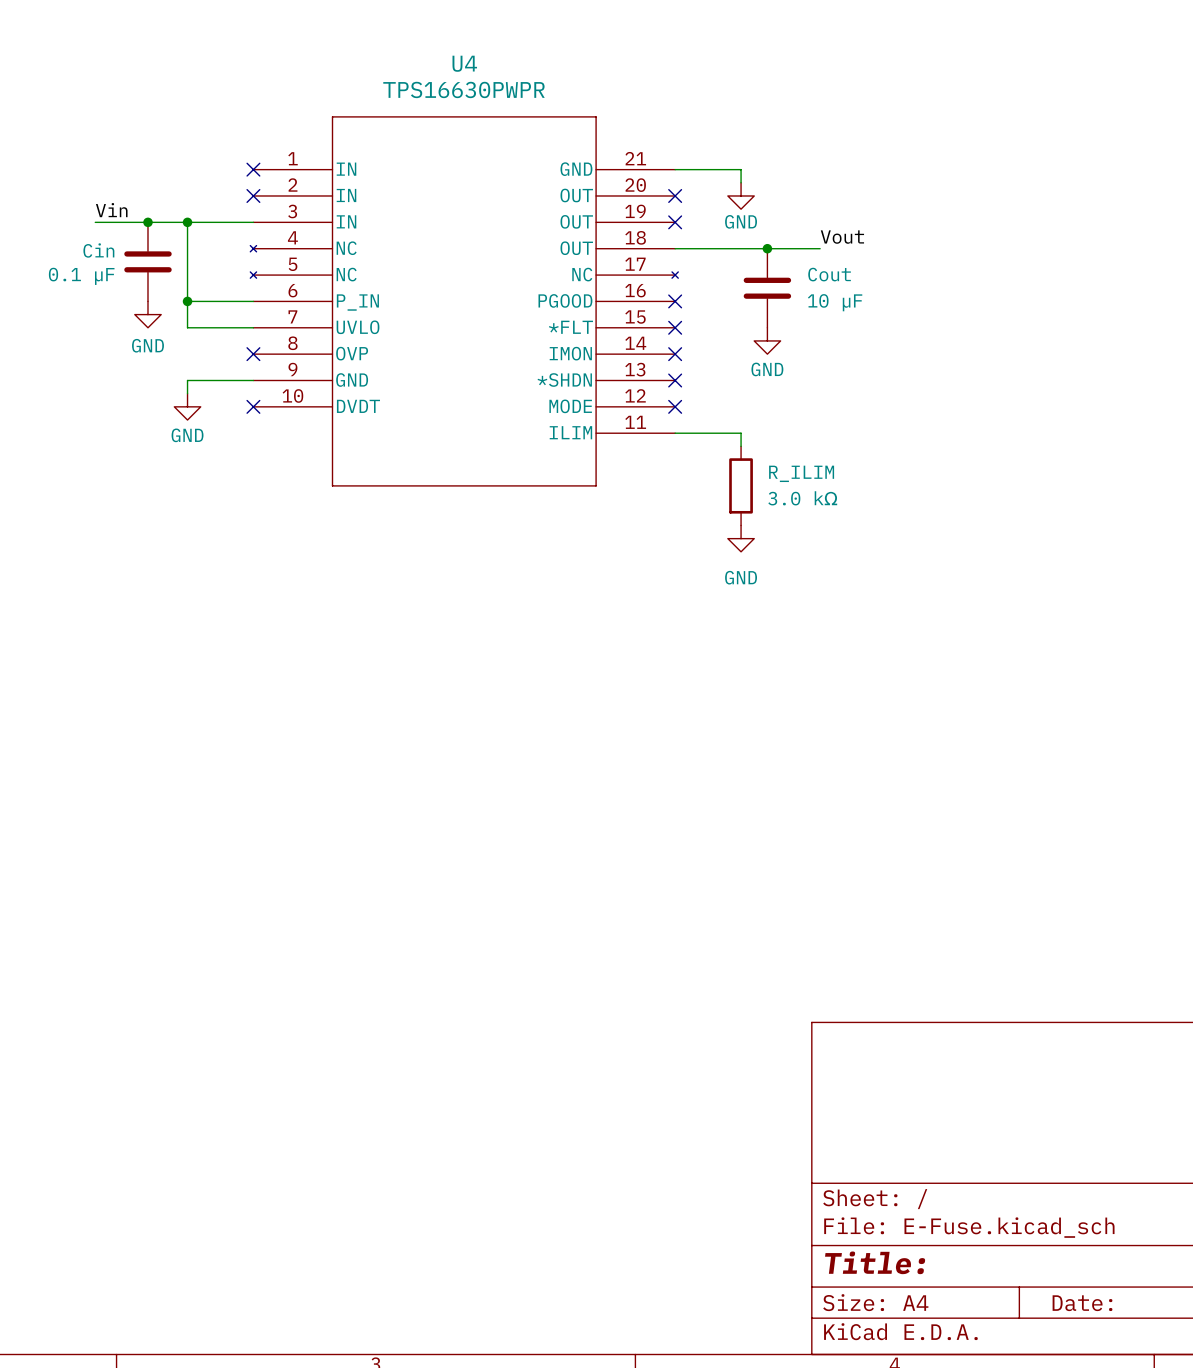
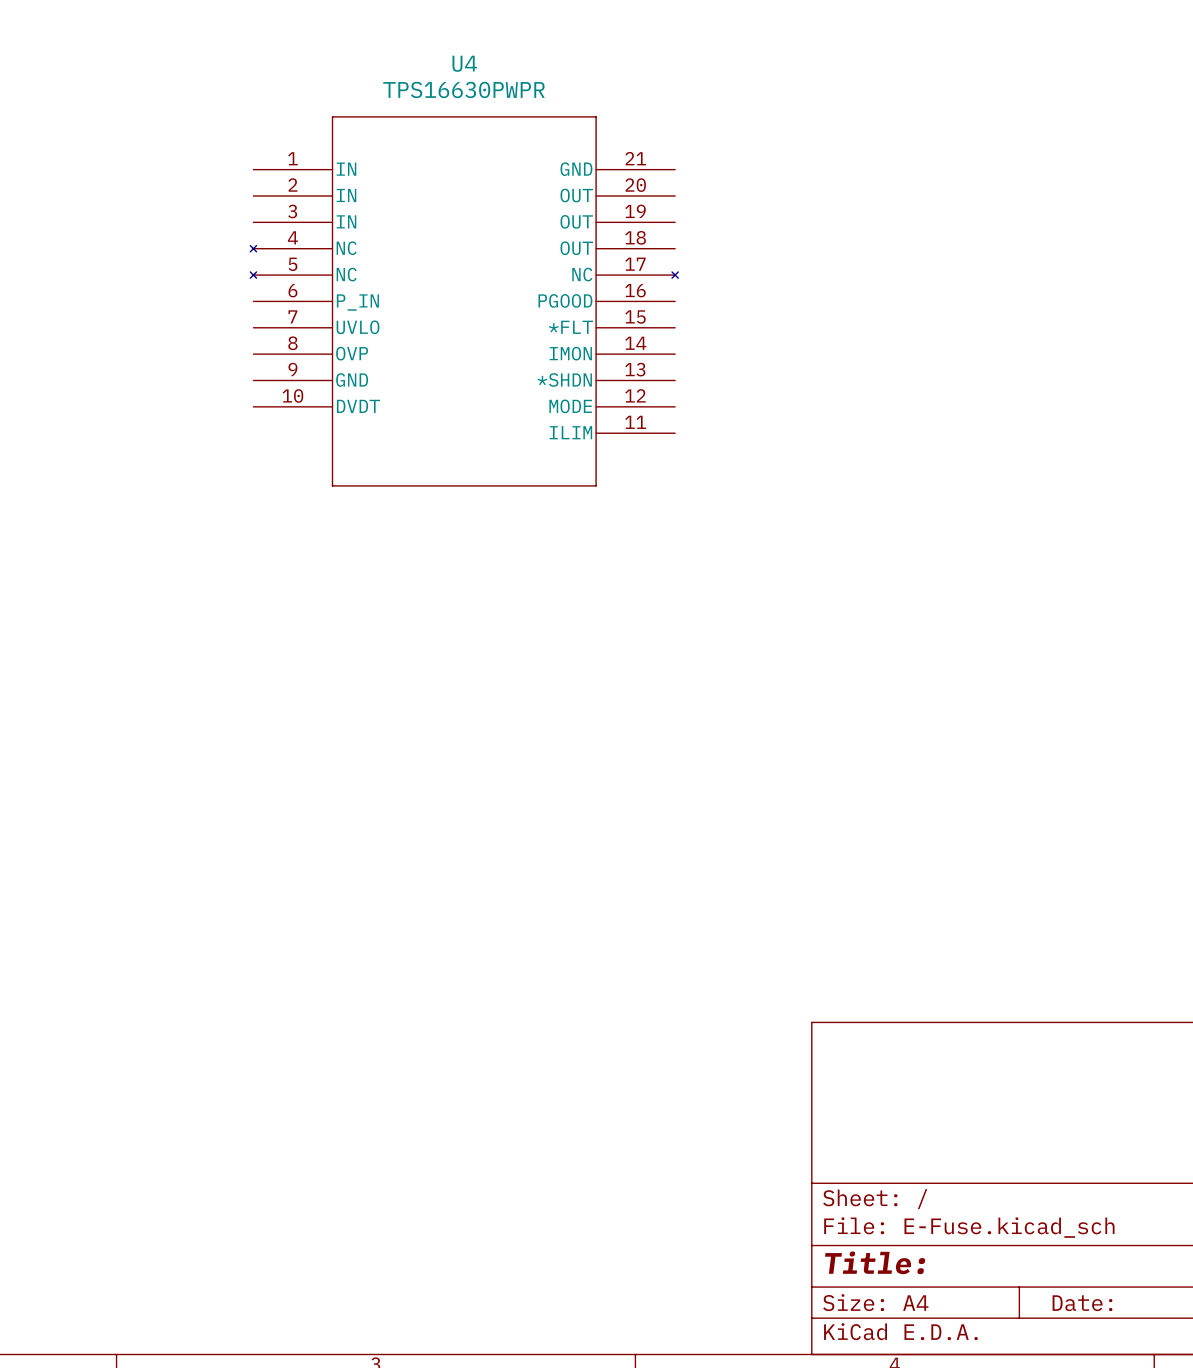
no-connect mark: (253, 169) -> none
wire: (675, 169) (741, 169) (741, 182) -> none
no-connect mark: (253, 195) -> none
no-connect mark: (675, 195) -> none
power symbol: GND (741, 195) -> none
label: Vin (111, 210) -> none
wire: (95, 222) (253, 222) -> none
junction: (147, 222) -> none
wire: (187, 222) (187, 327) (253, 327) -> none
junction: (187, 222) -> none
no-connect mark: (675, 222) -> none
label: Vout (842, 237) -> none
wire: (675, 248) (820, 248) -> none
junction: (767, 248) -> none
Cin: 0.1 µF (147, 261) -> none
Cout: 10 µF (767, 288) -> none
wire: (187, 301) (253, 301) -> none
junction: (187, 301) -> none
no-connect mark: (675, 301) -> none
power symbol: GND (147, 314) -> none
no-connect mark: (675, 327) -> none
power symbol: GND (767, 340) -> none
no-connect mark: (253, 354) -> none
no-connect mark: (675, 354) -> none
wire: (253, 380) (187, 380) (187, 393) -> none
no-connect mark: (675, 380) -> none
power symbol: GND (187, 406) -> none
no-connect mark: (253, 406) -> none
no-connect mark: (675, 406) -> none
wire: (675, 433) (741, 433) (741, 446) -> none
R_ILIM: 3.0 kΩ (741, 485) -> none
power symbol: GND (741, 538) -> none

